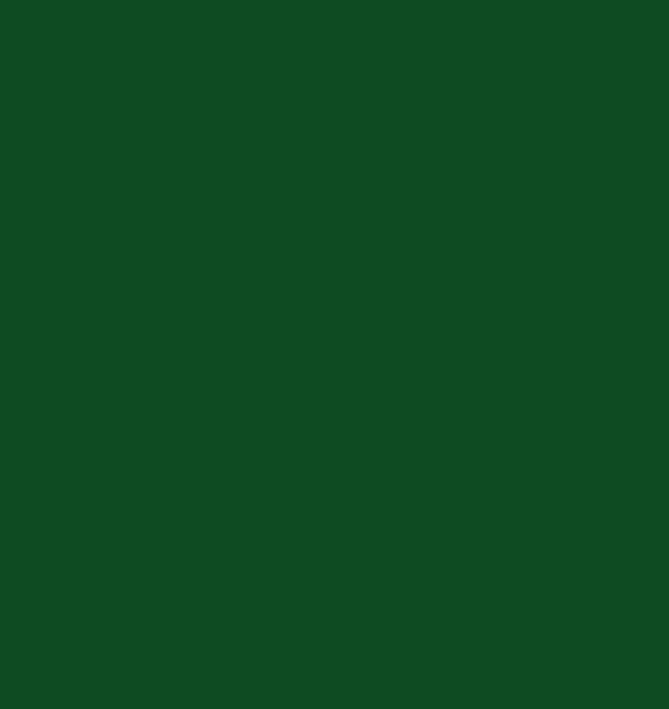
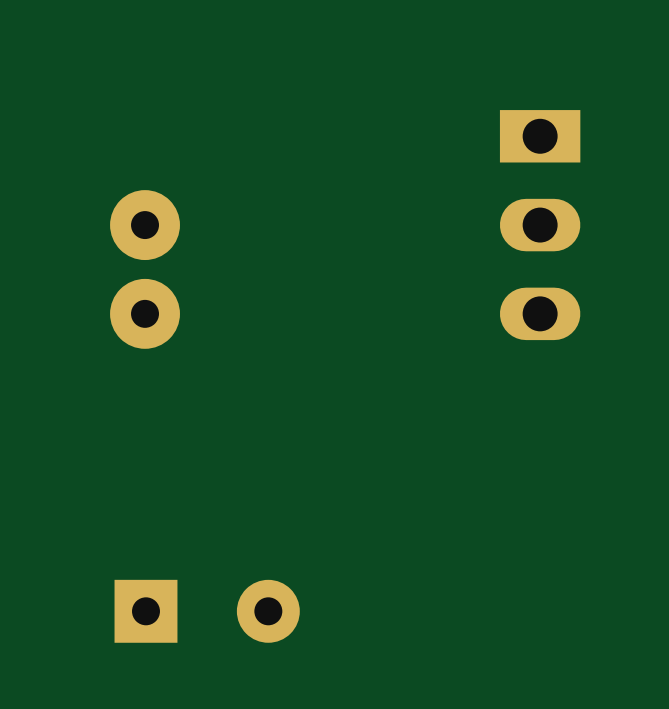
part: none -> (540, 225)
part: none -> (145, 269)
part: none -> (207, 611)

